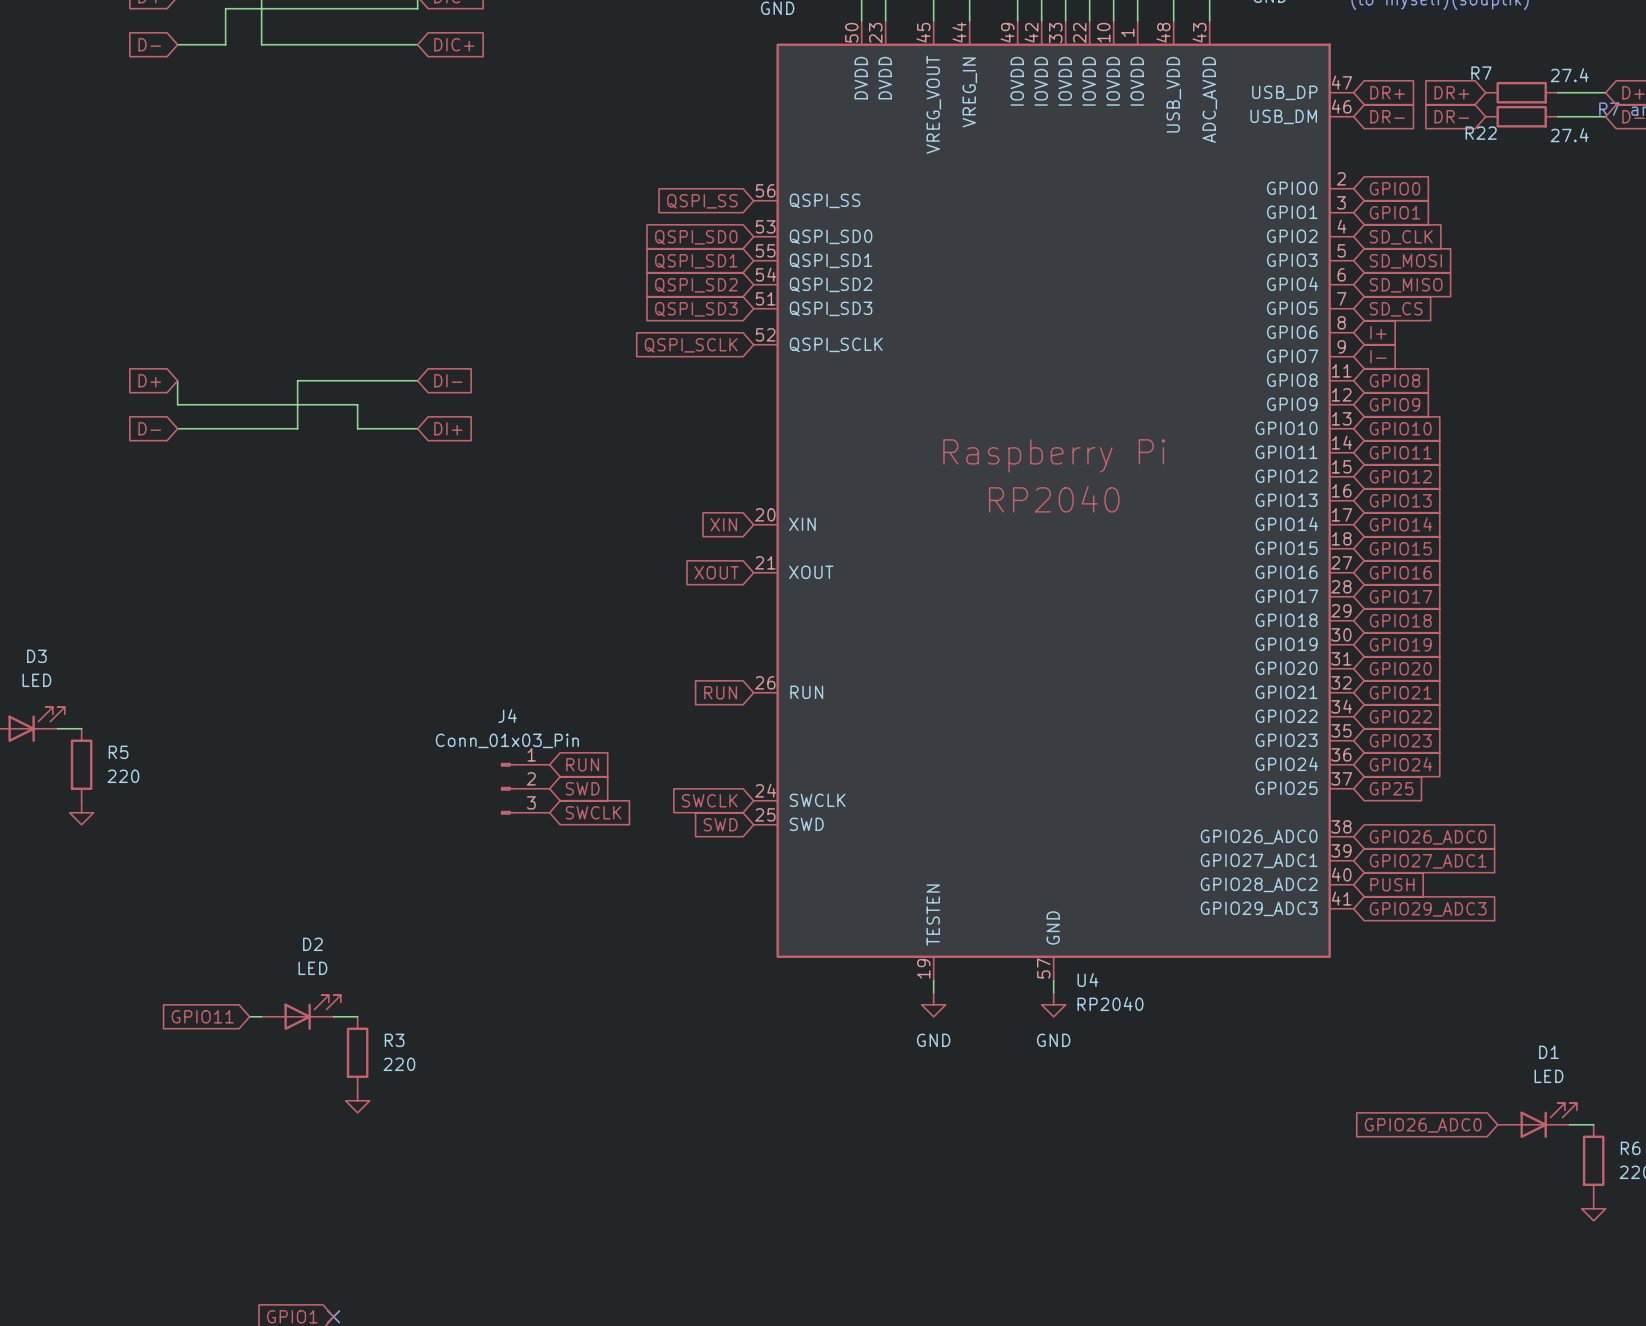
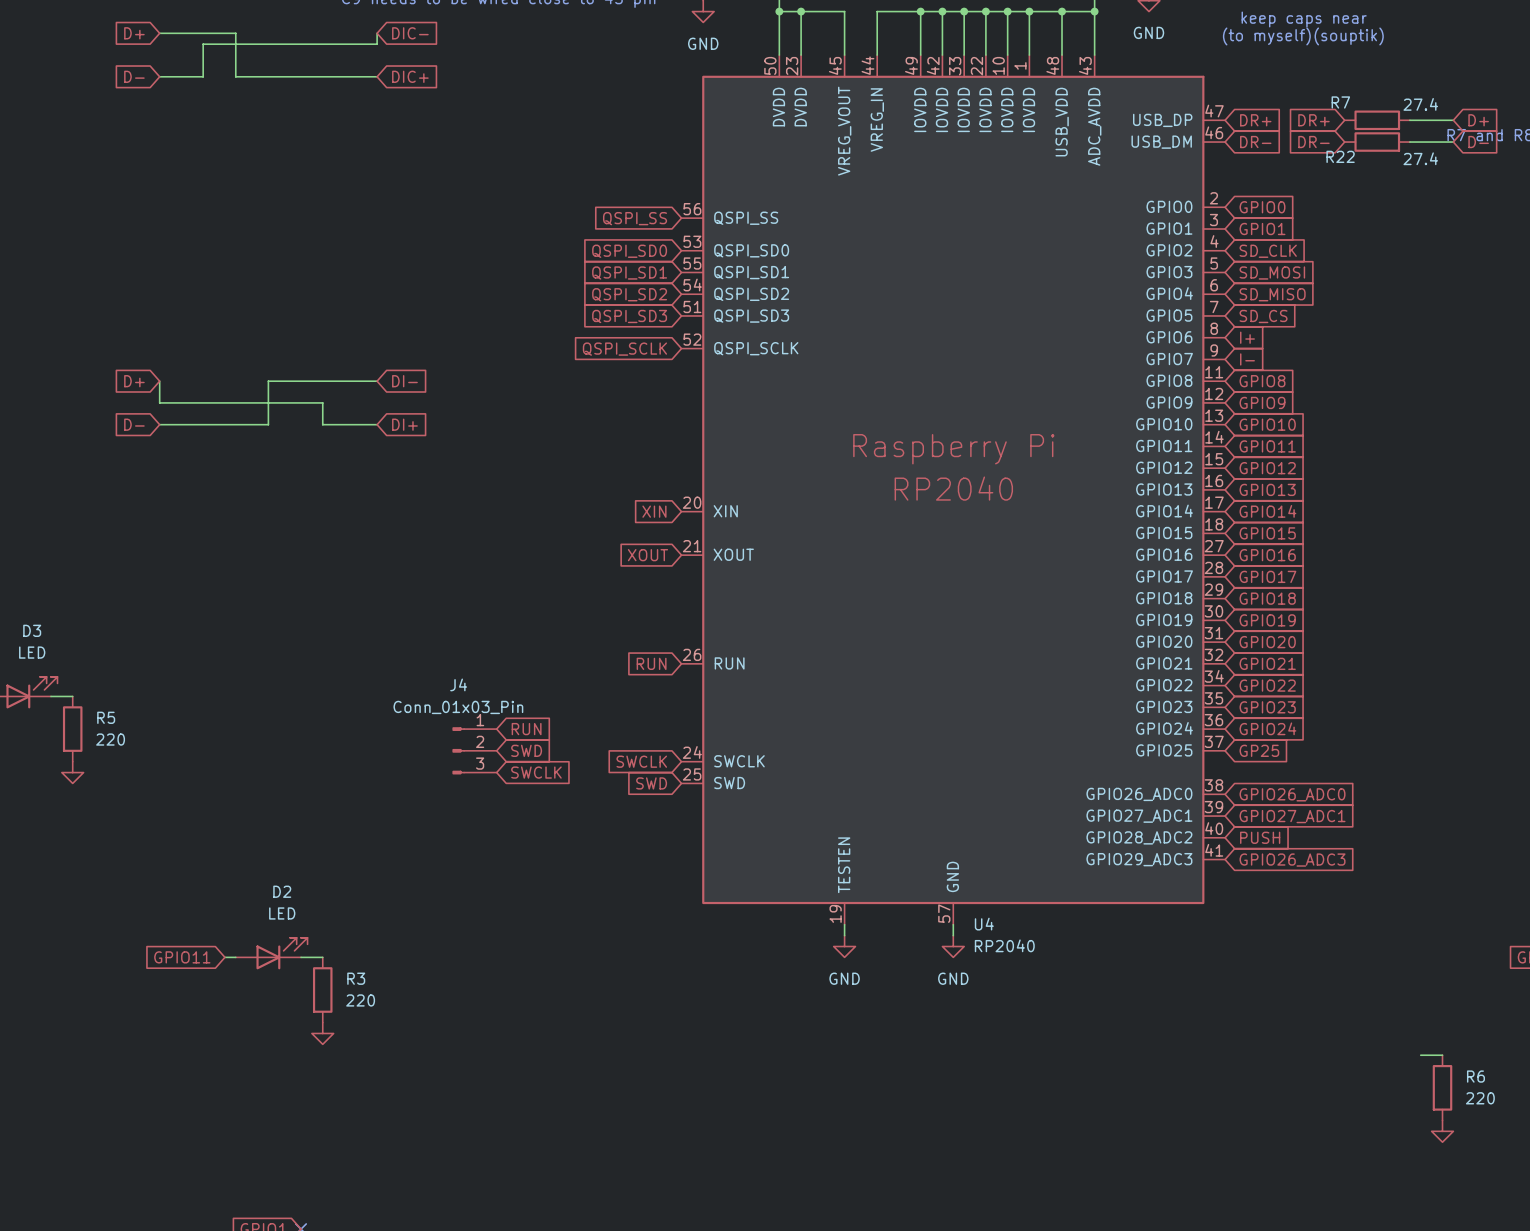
global label: GPIO29_ADC3 (1428, 909) -> GPIO26_ADC3 (1292, 860)
D1: LED (1537, 1120) -> none
global label: GPIO26_ADC0 (1423, 1125) -> none

